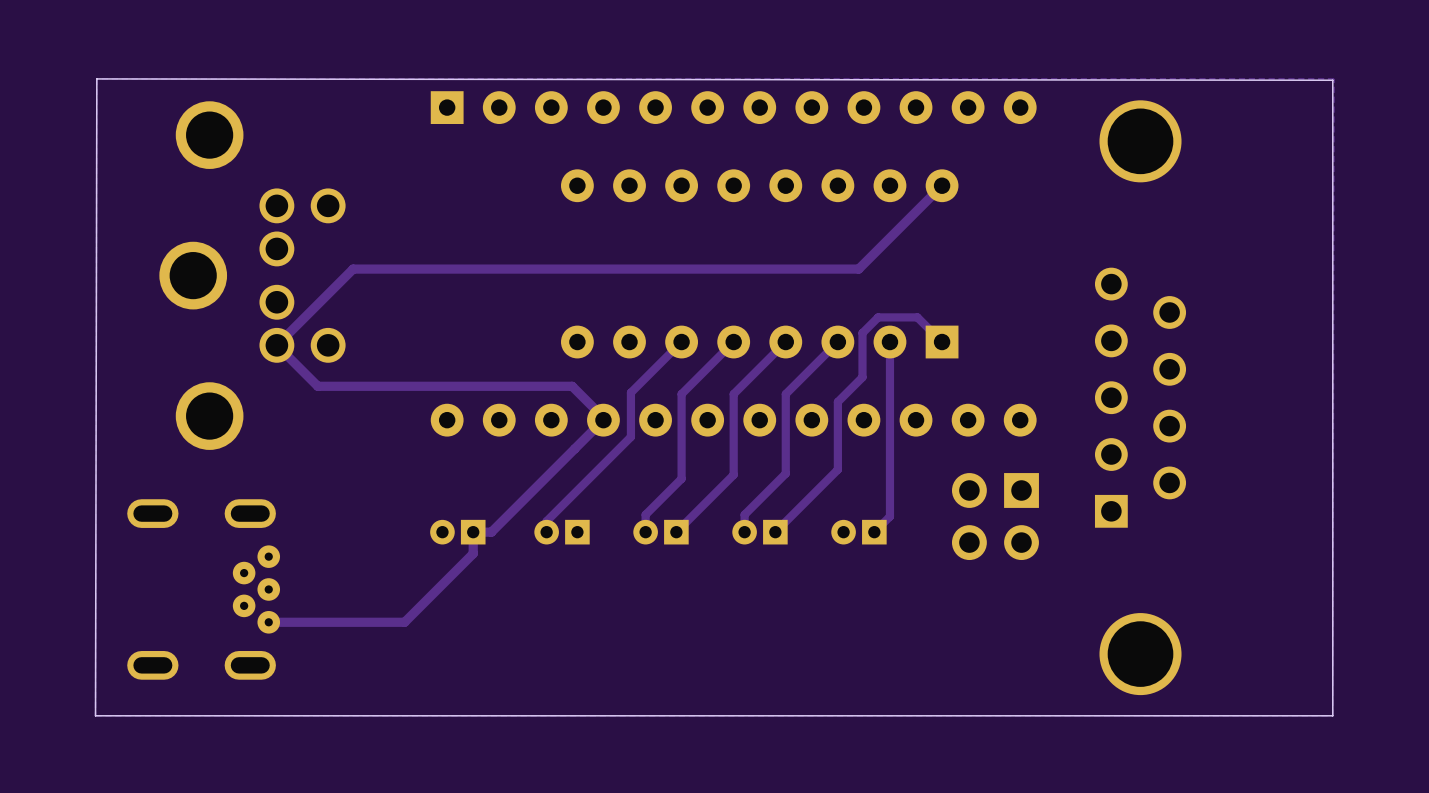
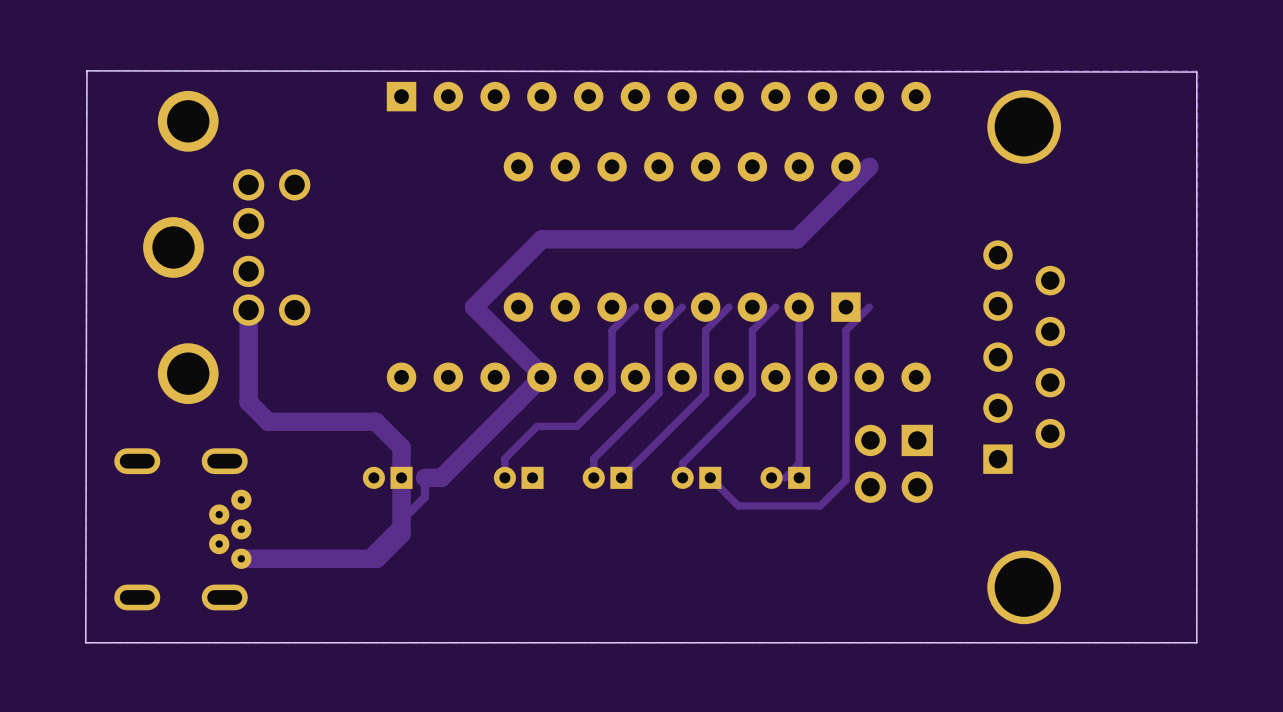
track: (942, 185) (858, 269) (353, 269) (276, 345) (317, 386) (572, 386) -> (869, 166) (796, 239) (541, 239) (474, 307) (513, 346)
track: (681, 342) (630, 392) (630, 436) (546, 521) (546, 532) -> none
track: (733, 342) (681, 394) -> (635, 307) (612, 330) (612, 353)
track: (785, 342) (733, 394) -> (682, 307) (658, 330) (658, 353)
track: (837, 342) (785, 394) -> (728, 307) (705, 330) (705, 353)
track: (942, 342) (917, 317) (878, 317) (862, 333) (862, 377) (837, 401) -> (775, 307) (752, 330) (752, 360)
track: none -> (869, 307) (845, 330) (845, 480) (820, 505) (738, 505) (710, 477)
track: none -> (248, 310) (248, 402) (268, 421) (375, 421) (401, 447) (401, 534) (376, 558) (363, 558)
track width: thin (572, 386) (603, 417) (603, 420) (491, 532) (473, 532) -> thick (513, 346) (541, 374) (541, 377) (441, 477) (424, 477)
track: (681, 435) (681, 478) (645, 514) (645, 532) -> (612, 391) (576, 426) (537, 426) (504, 458) (504, 477)
track: (733, 438) (733, 474) (676, 532) -> (658, 393) (593, 458) (593, 477)
track: (785, 438) (785, 473) (744, 514) (744, 532) -> (705, 393) (621, 477)
track: (837, 438) (837, 469) (775, 532) -> (752, 393) (682, 463) (682, 477)
part position: (457, 532) -> (387, 477)
part position: (562, 532) -> (518, 477)
part position: (661, 532) -> (607, 477)
part position: (759, 532) -> (696, 477)
part position: (858, 532) -> (785, 477)
track width: thin (404, 622) (268, 622) -> thick (363, 558) (241, 558)

